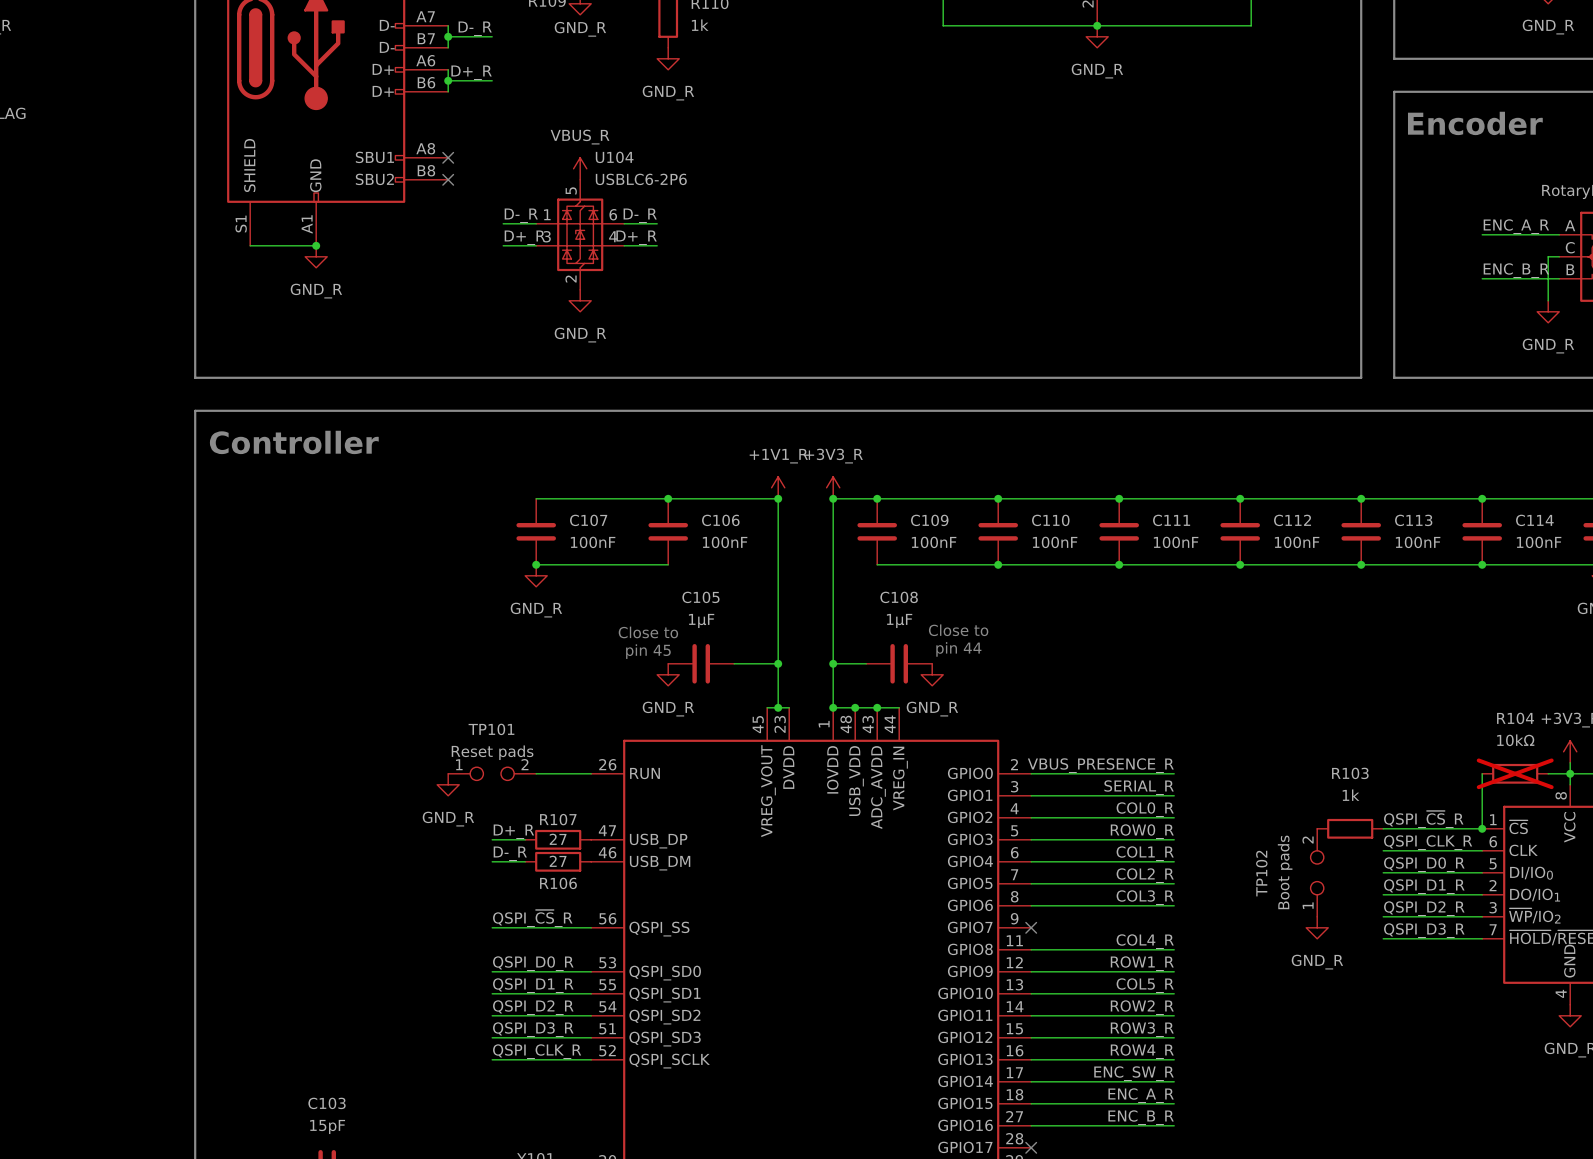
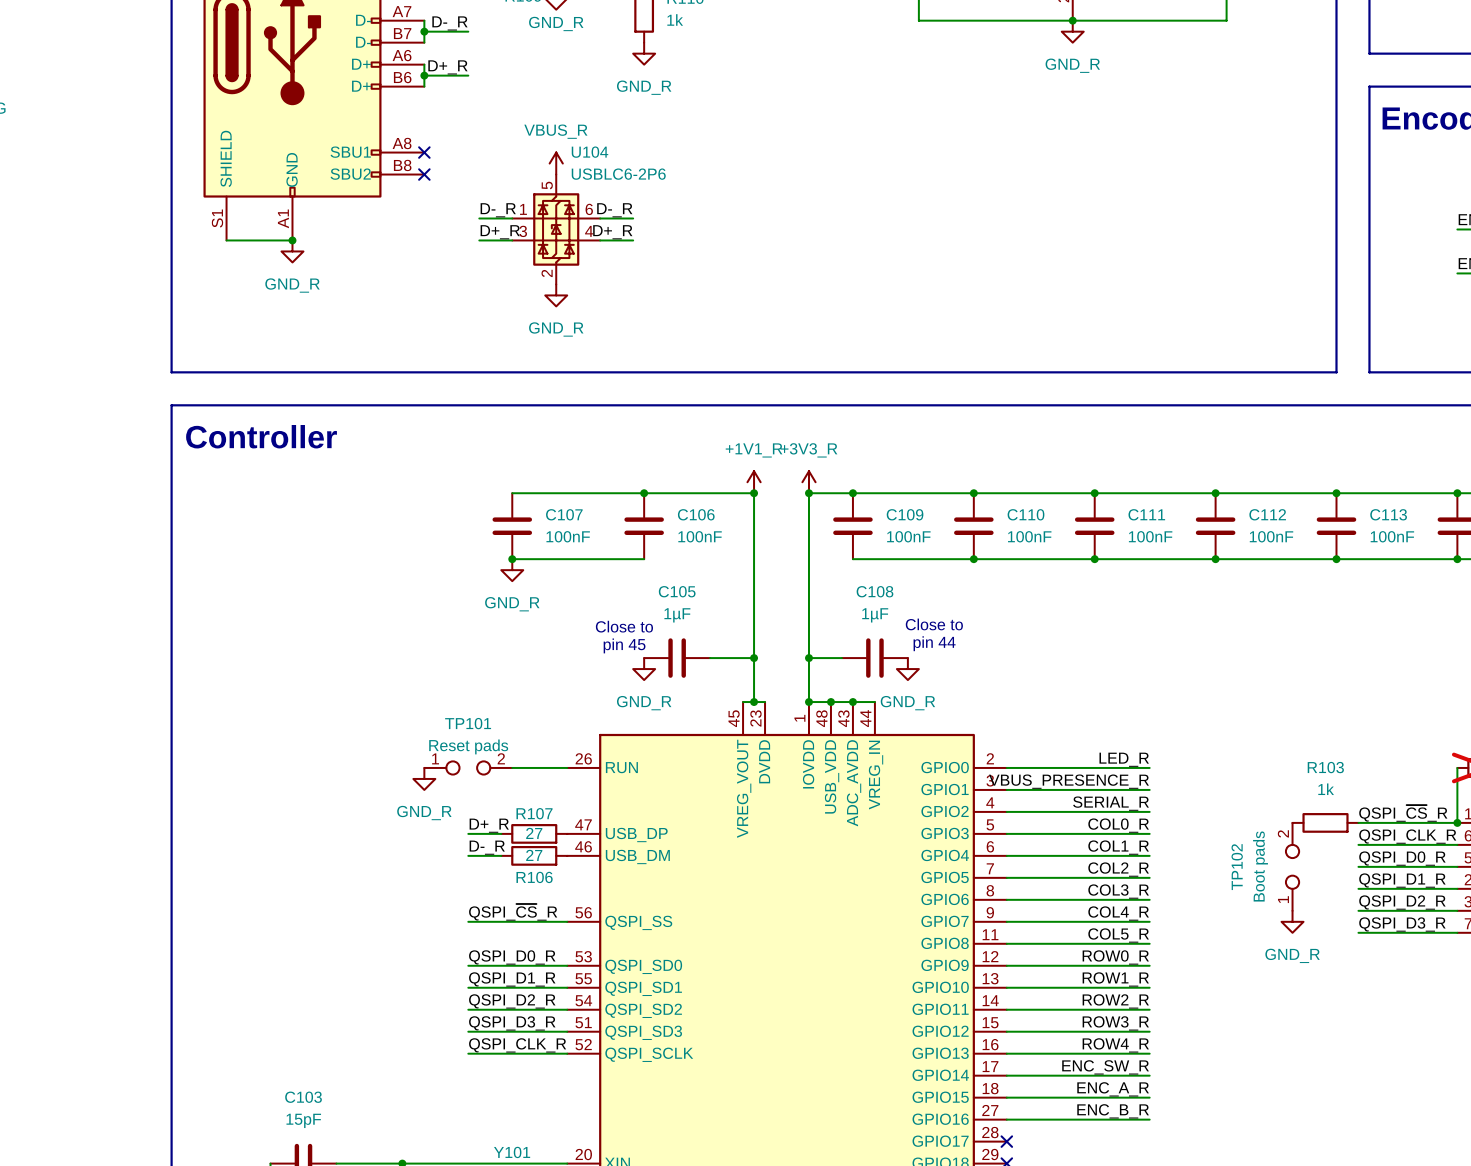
label: VBUS_PRESENCE_R (1100, 765) -> LED_R (1124, 759)
label: SERIAL_R (1139, 787) -> VBUS_PRESENCE_R (1068, 781)
label: COL0_R (1145, 809) -> SERIAL_R (1111, 803)
label: ROW0_R (1142, 831) -> COL0_R (1118, 825)
label: none -> COL4_R (1118, 913)
wire: none -> (1006, 921) (1149, 921)
no-connect mark: (1031, 927) -> none
label: COL4_R (1145, 941) -> COL5_R (1118, 935)
label: ROW1_R (1142, 963) -> ROW0_R (1115, 957)
label: COL5_R (1145, 985) -> ROW1_R (1115, 979)

